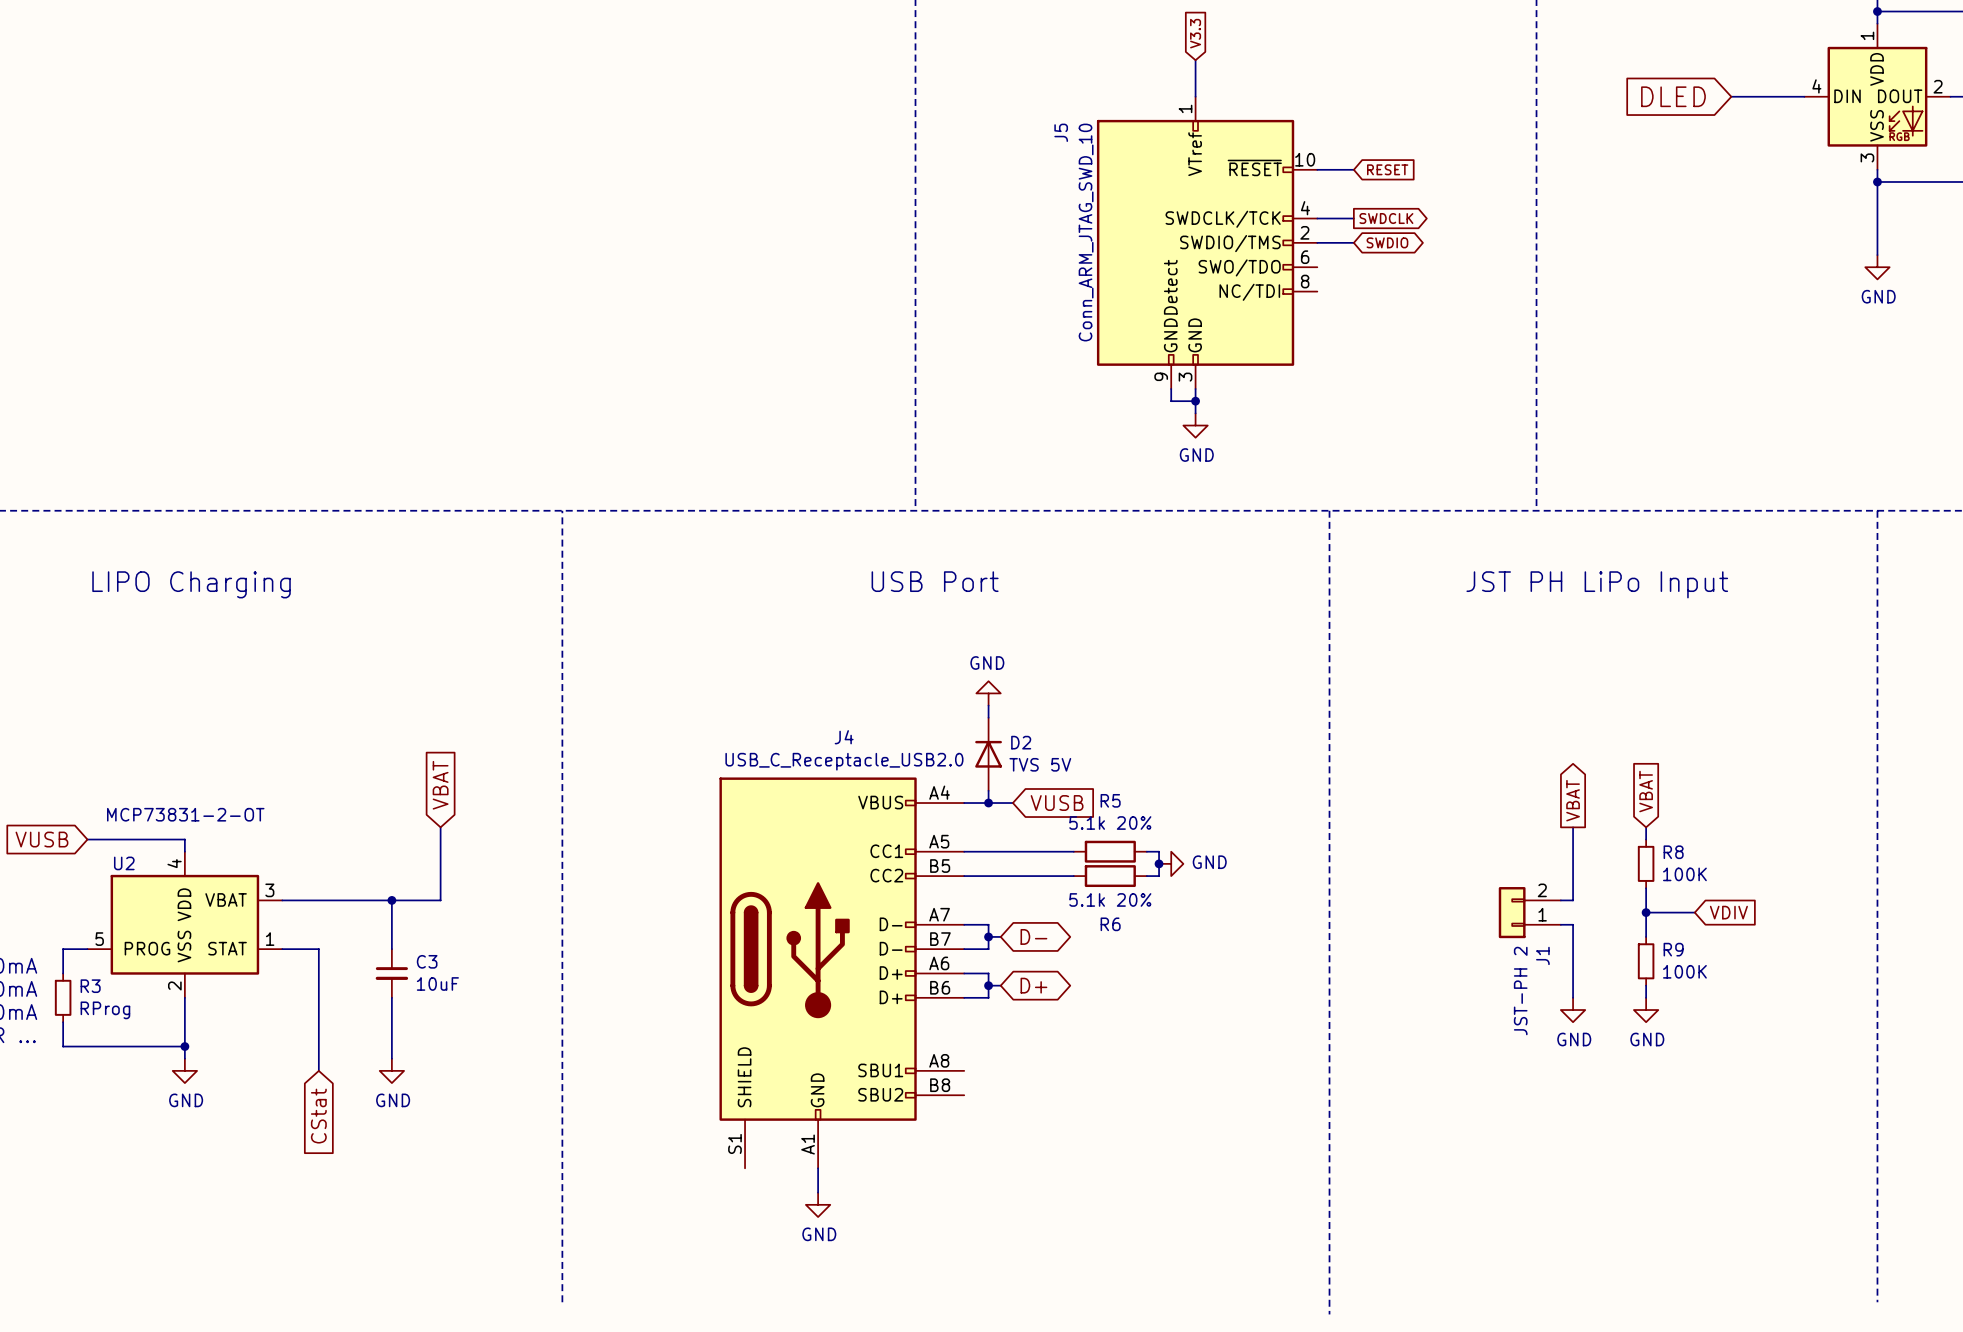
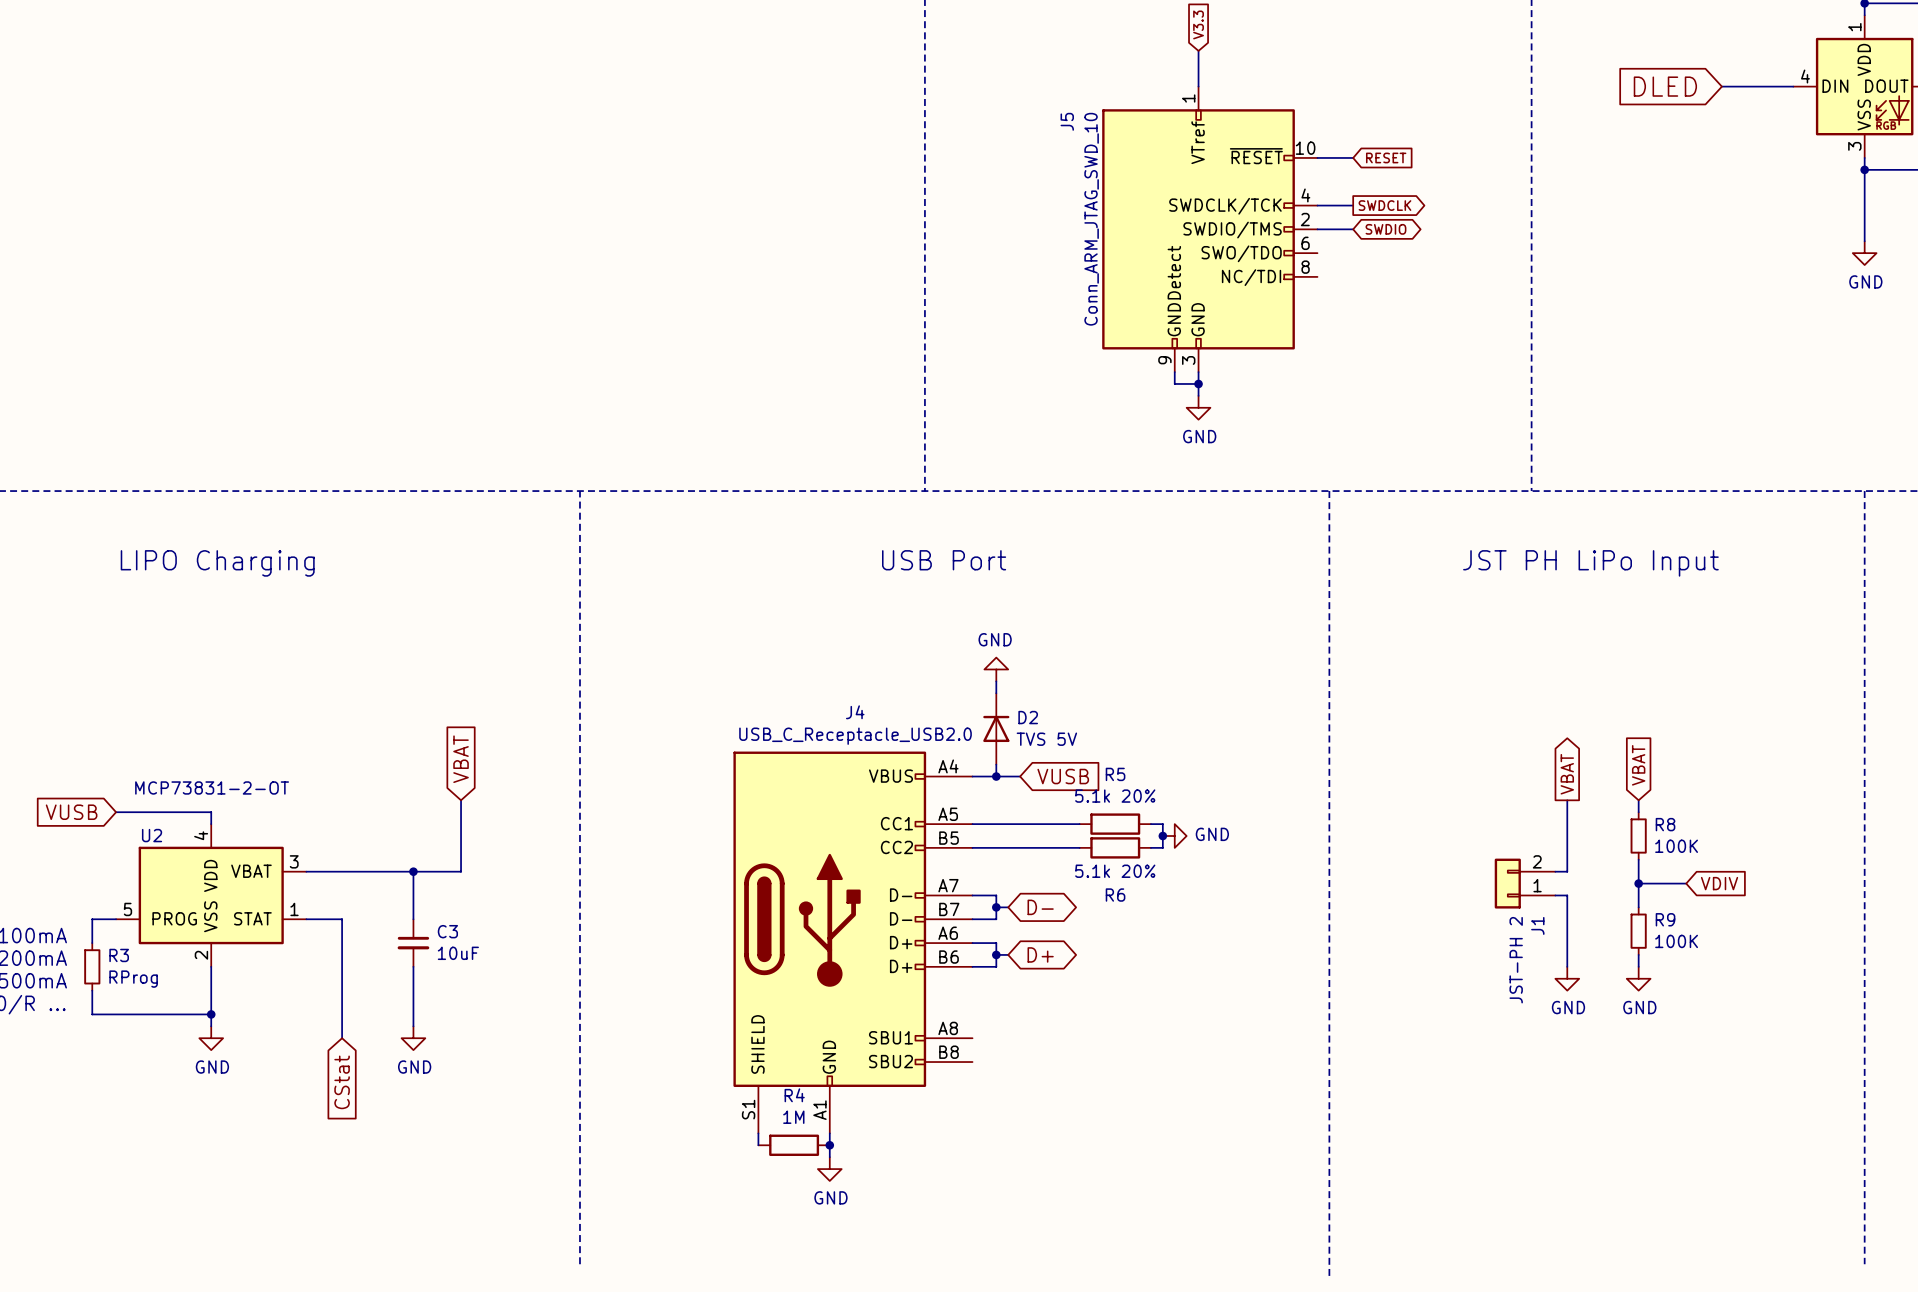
wire: none -> (758, 1133) (758, 1145)
R4: none -> 1M (794, 1145)
junction: none -> (829, 1145)

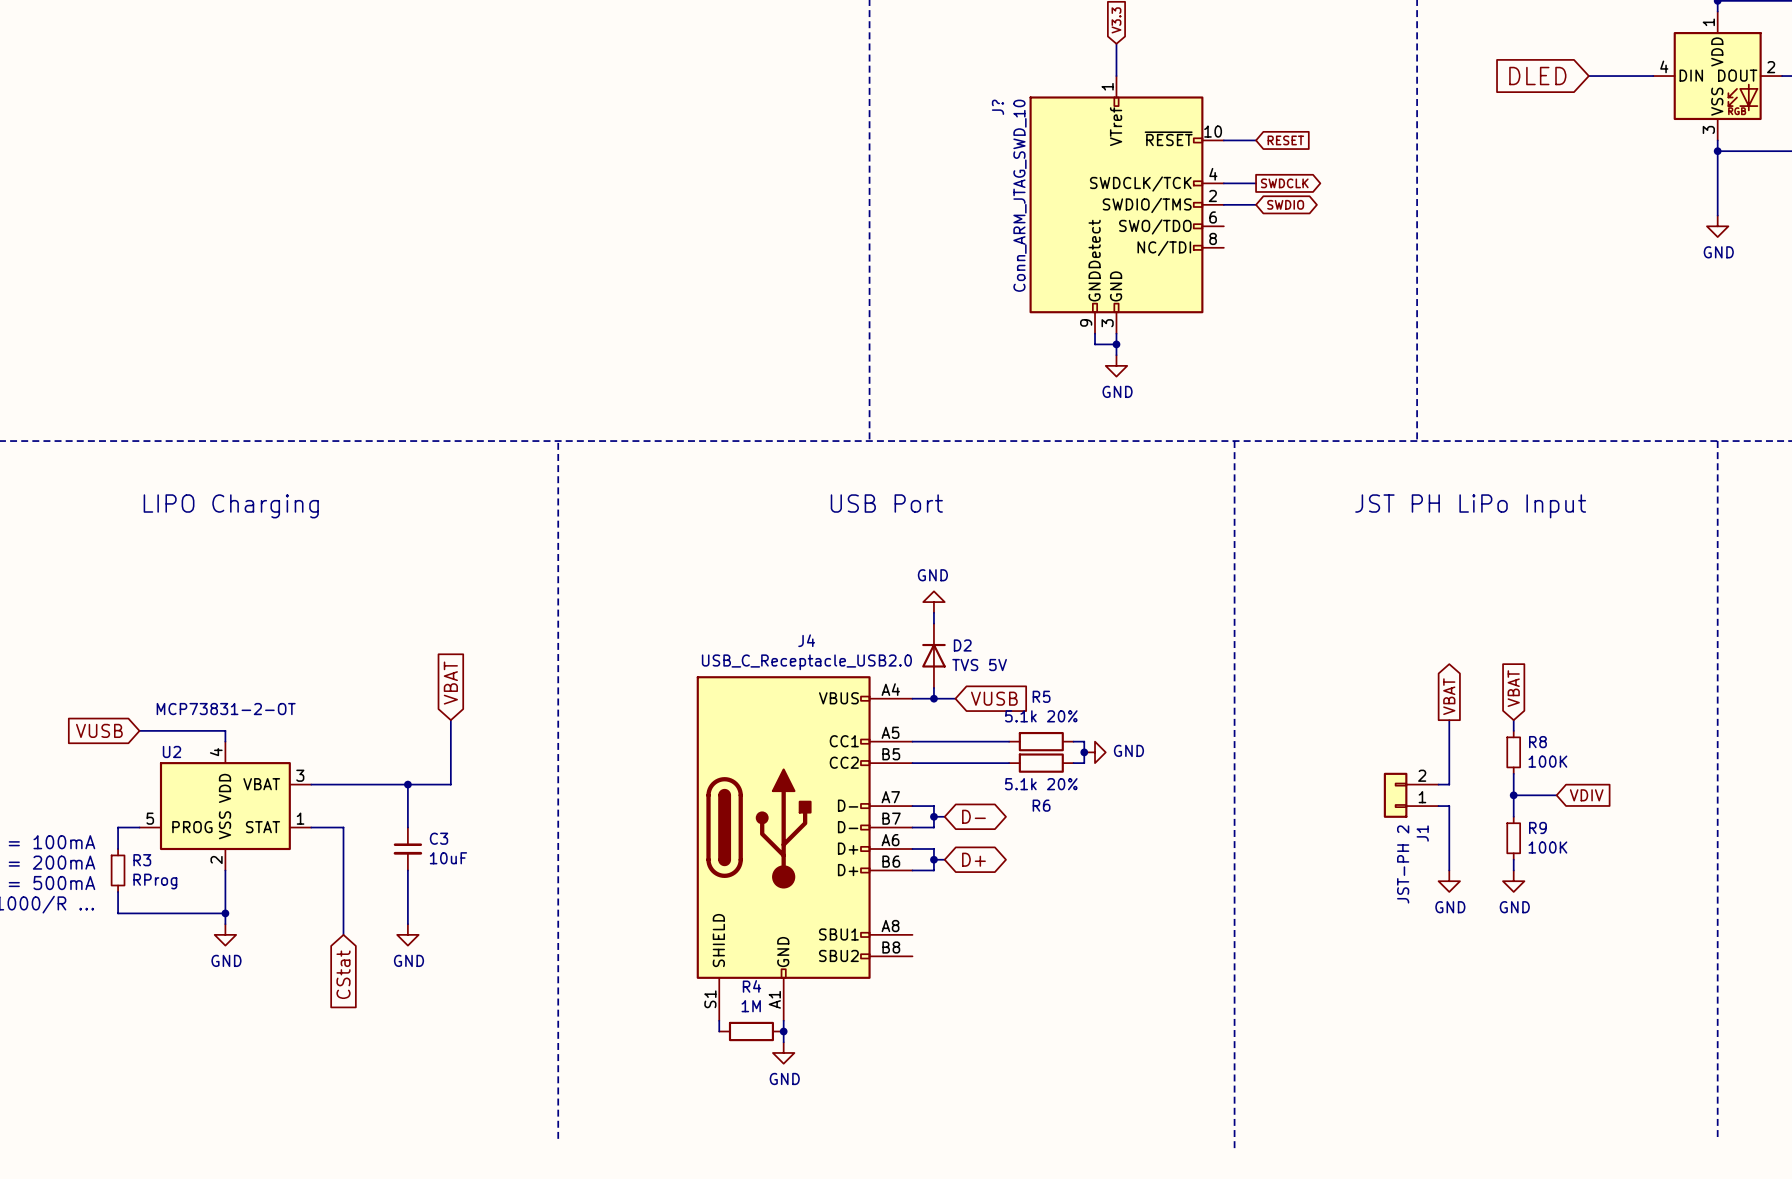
J5 name: J5 (1067, 121) -> J? (997, 107)

